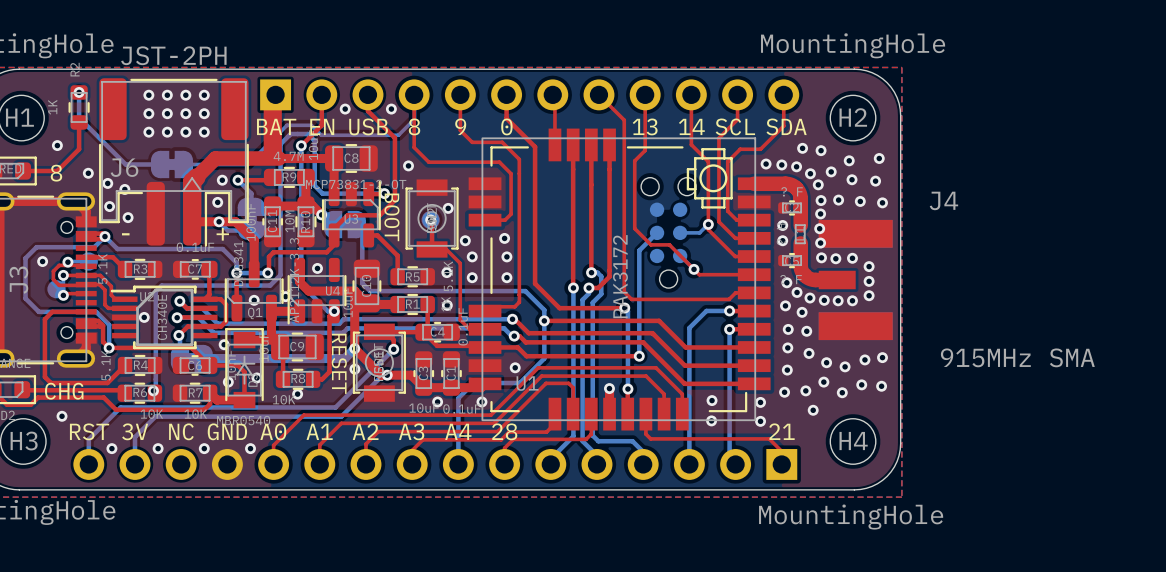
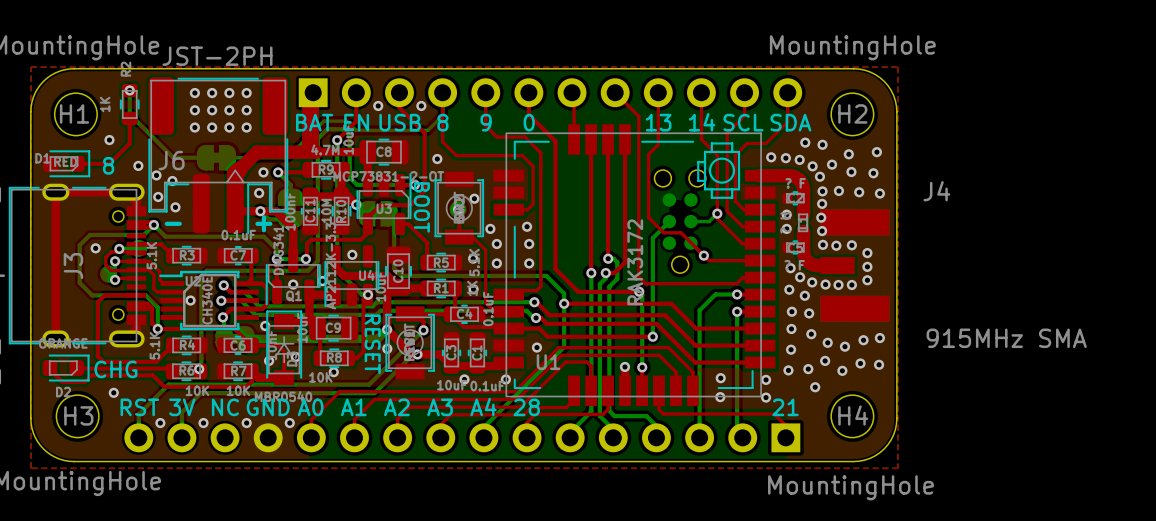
bottom track: (544, 358) (519, 383) (473, 383) (458, 398) (458, 453) -> (564, 338) (564, 347) (483, 427)

